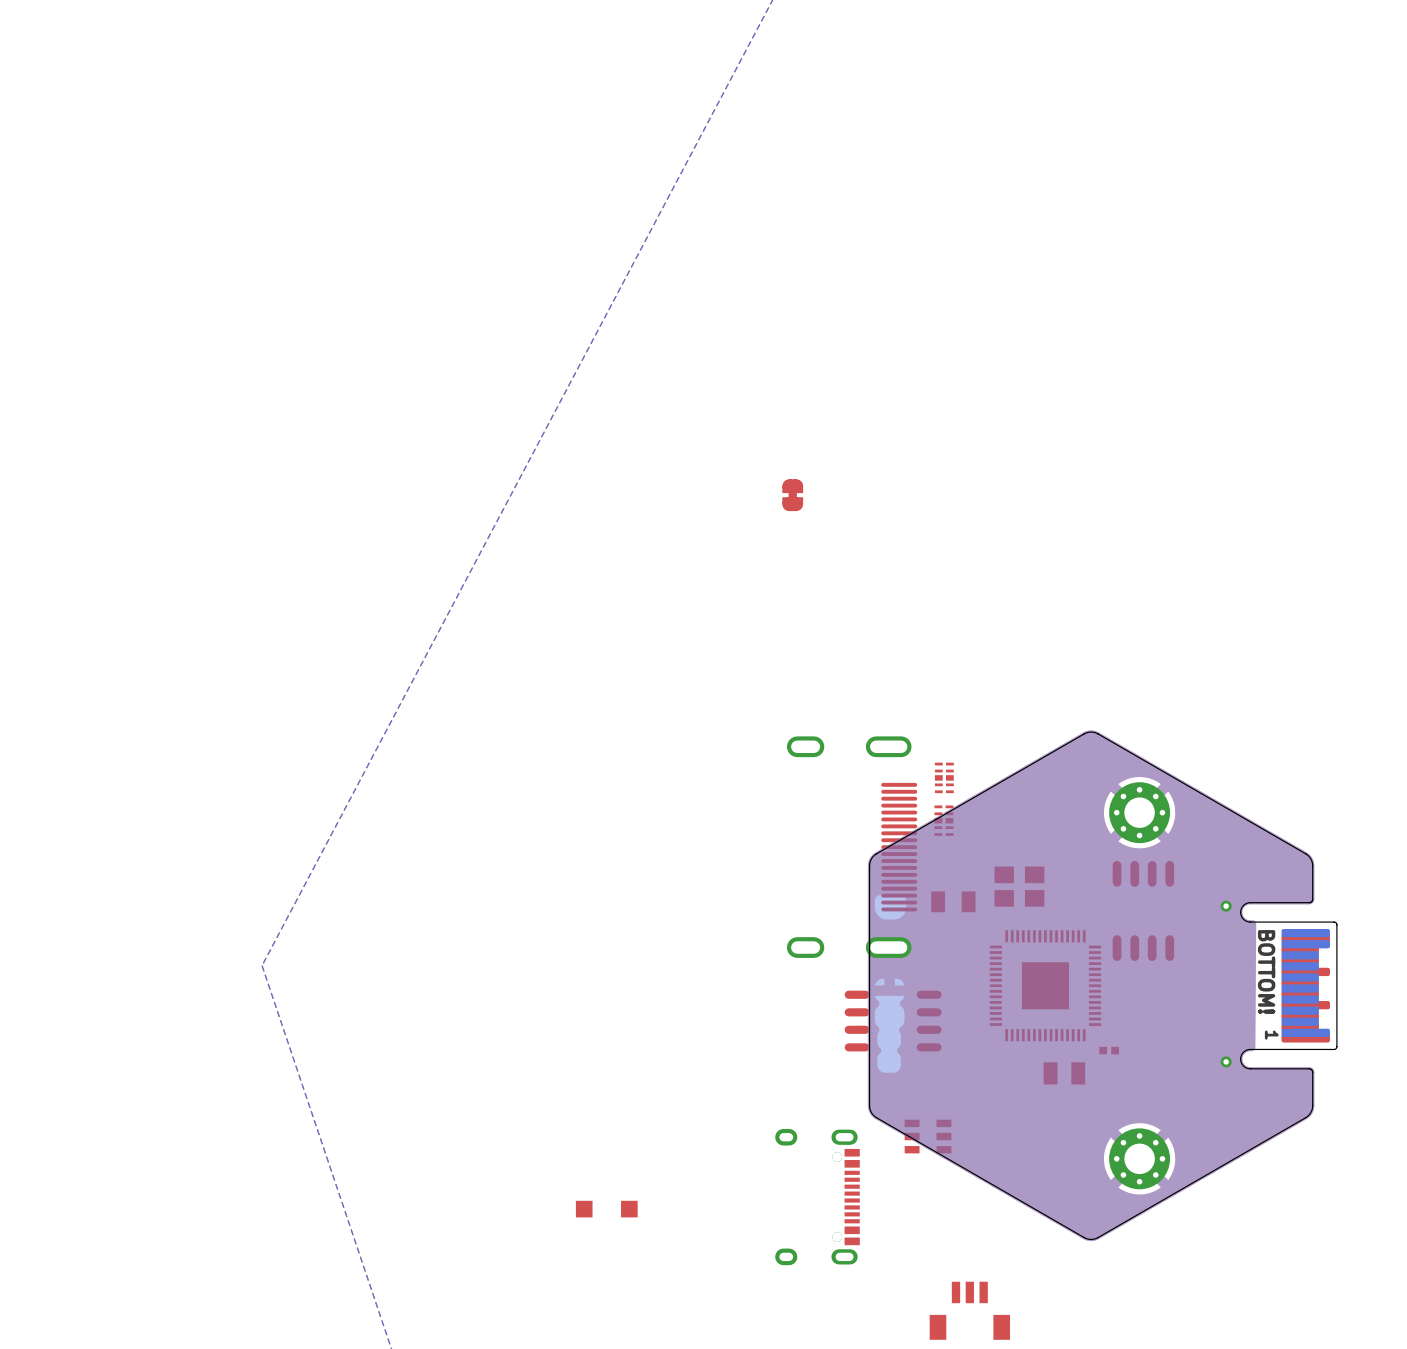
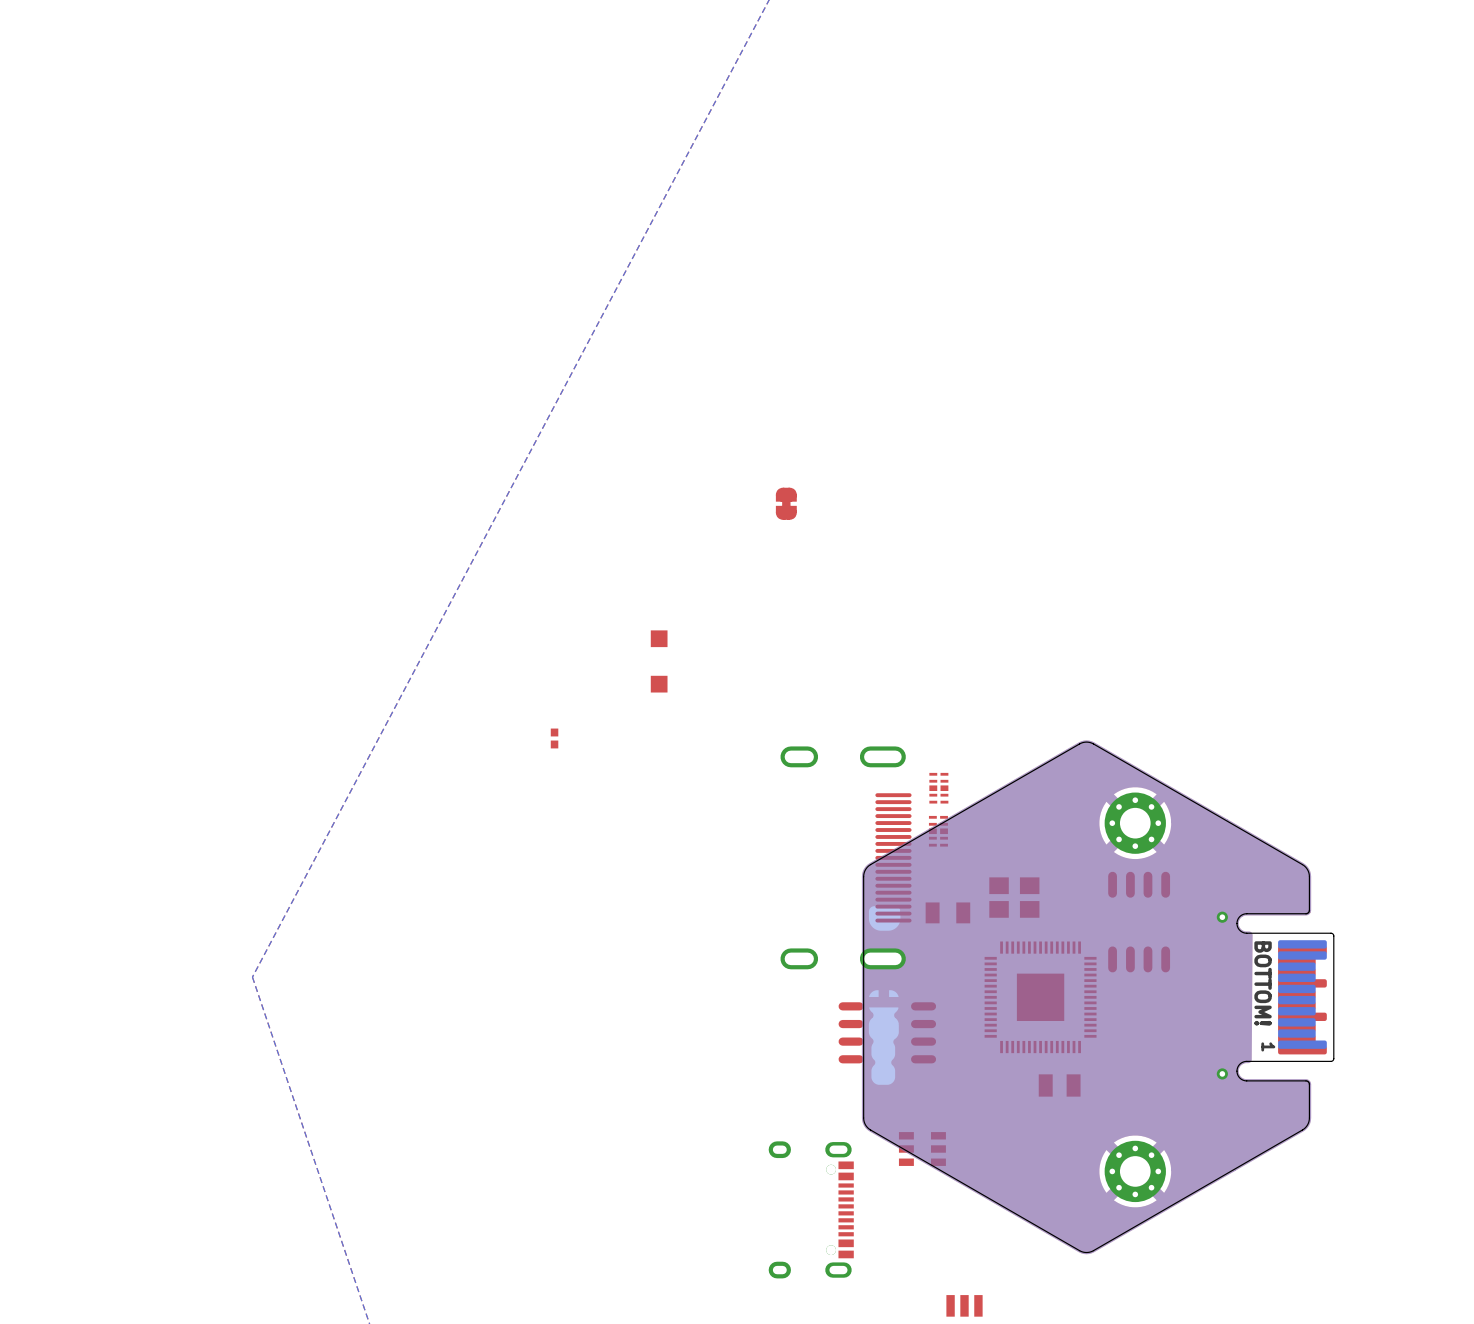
part: none -> (659, 661)
part: none -> (554, 738)
part: (1109, 1050) -> none
part: (606, 1209) -> none

